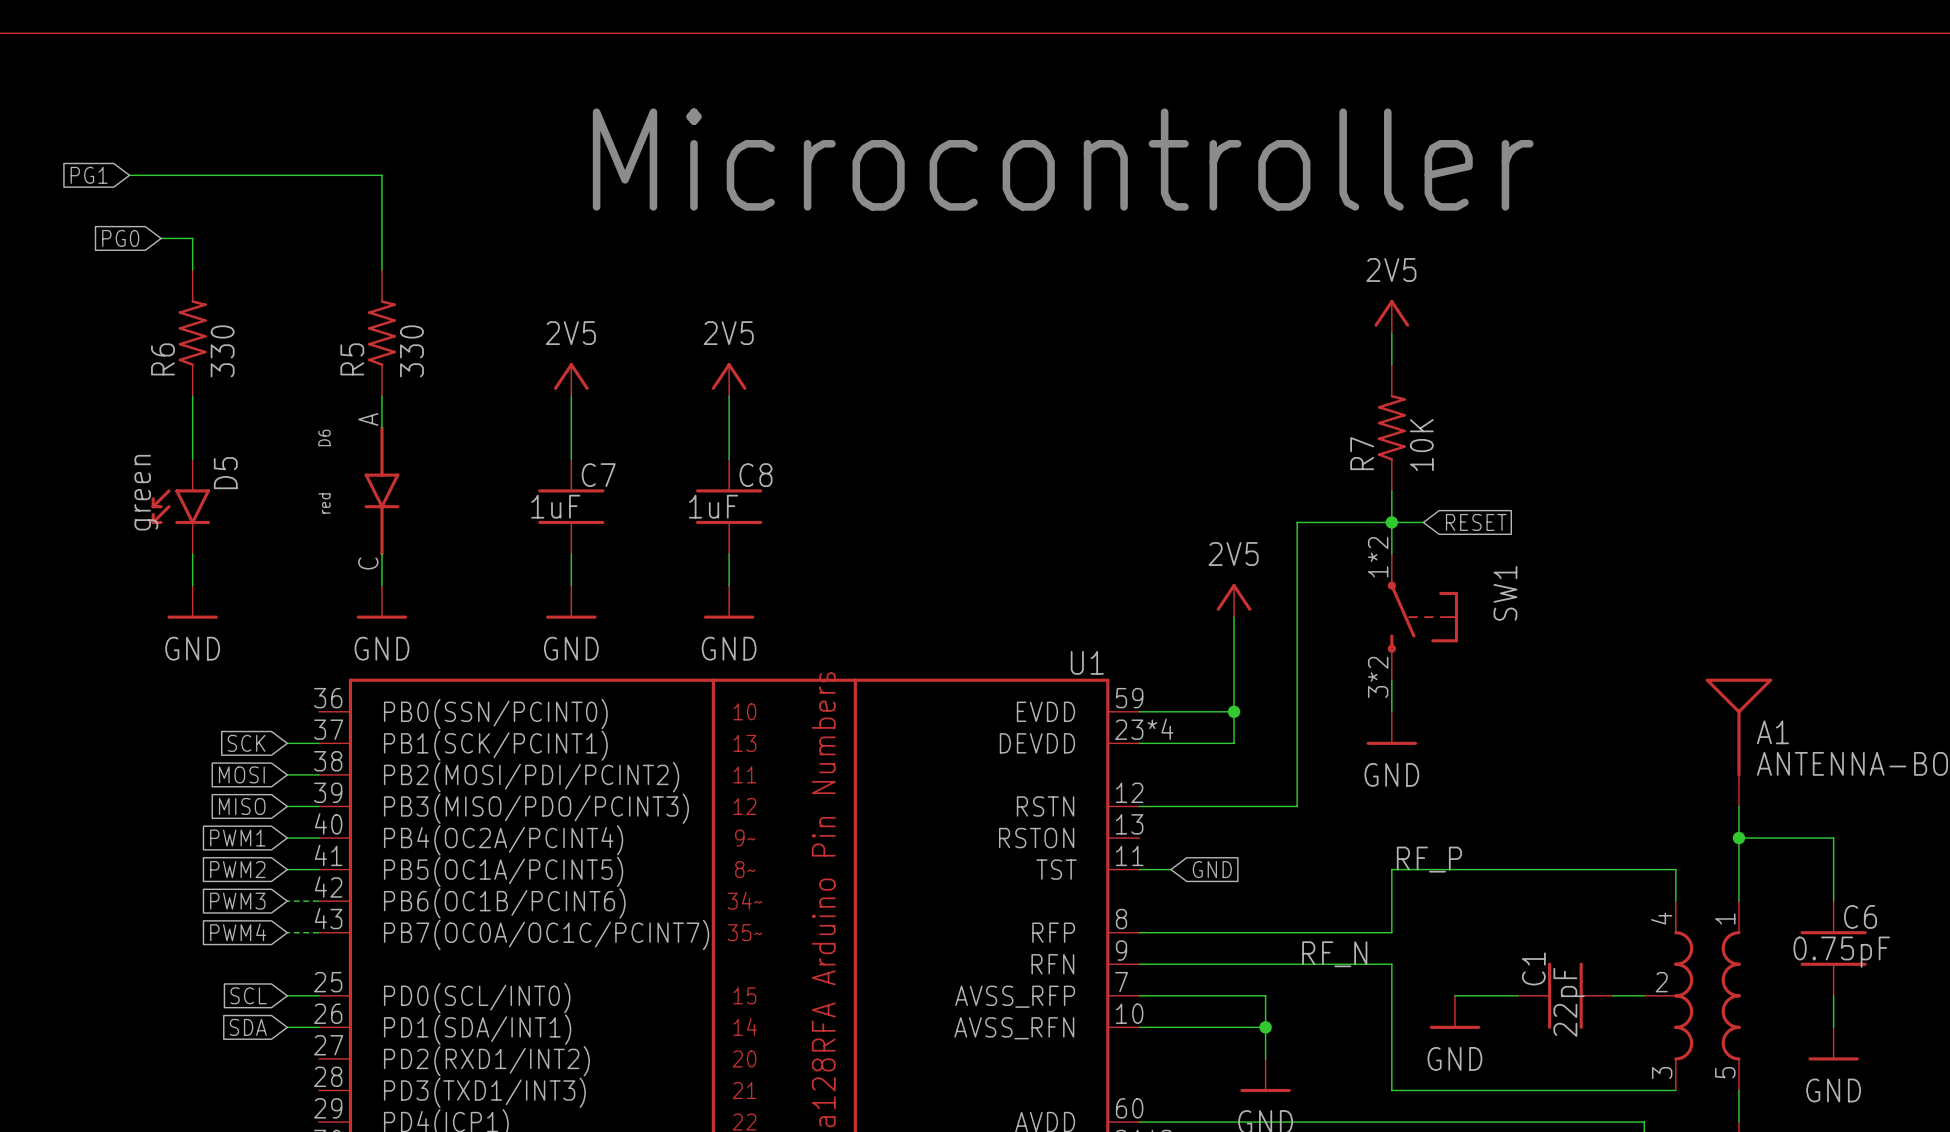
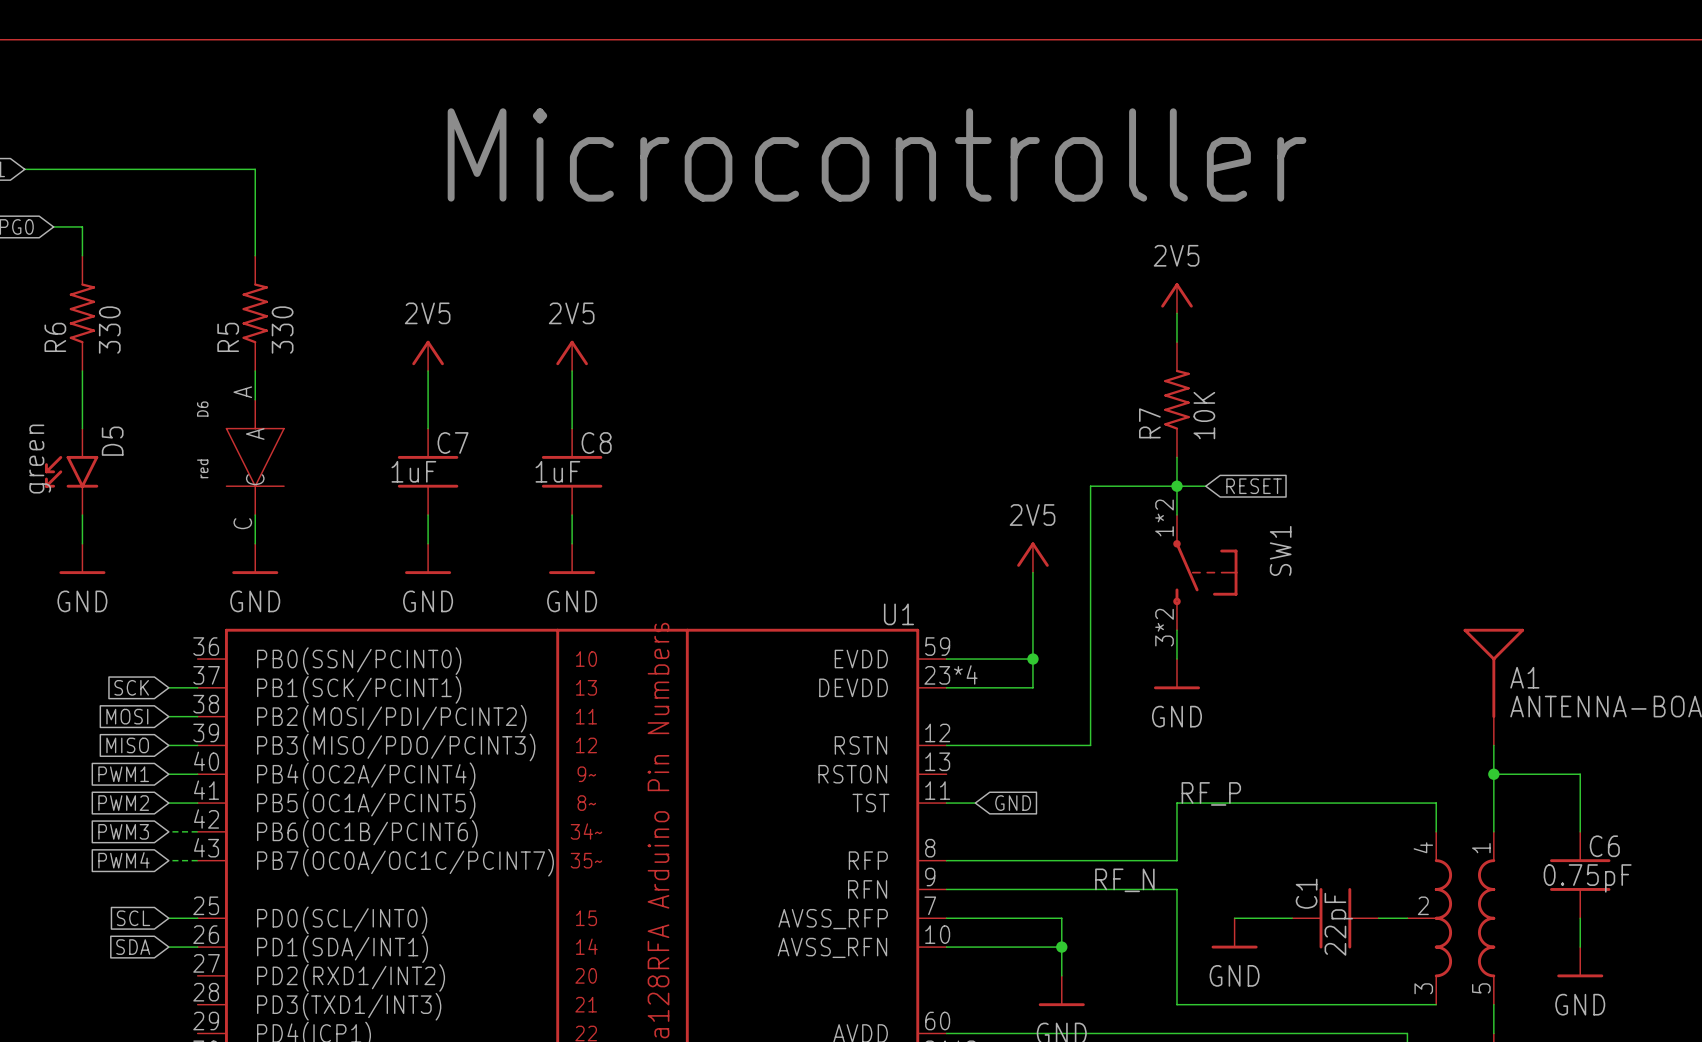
D6 symbol: [364, 426, 400, 556] -> [225, 399, 285, 516]

